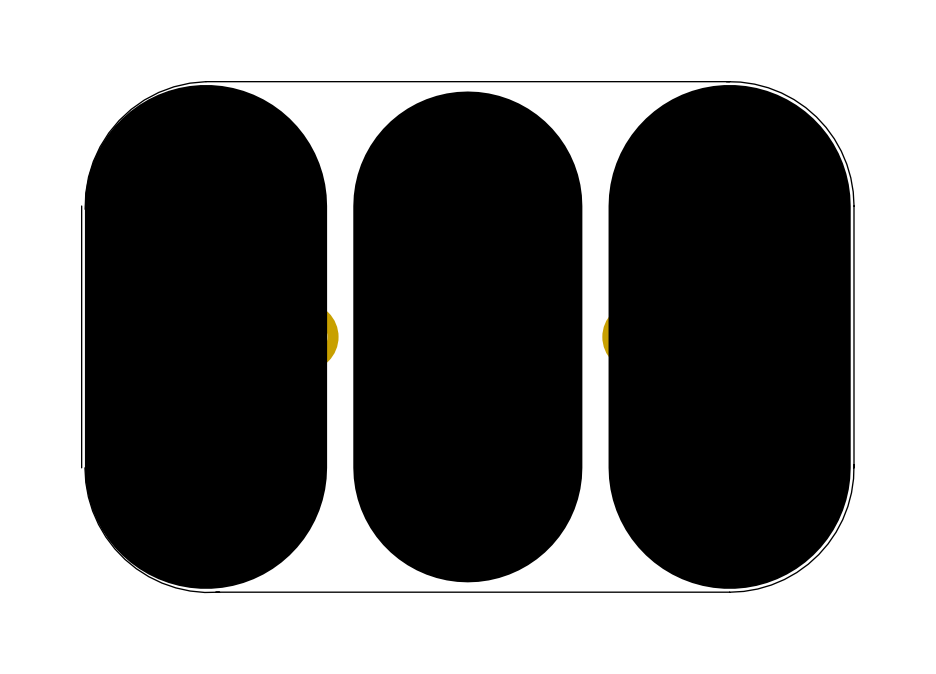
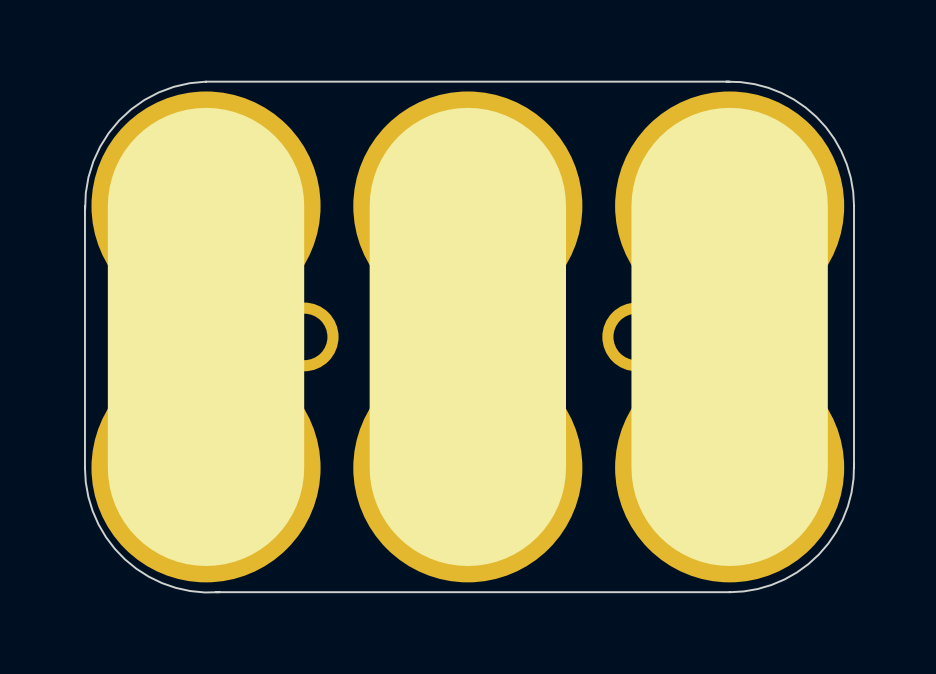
part footprint: [80, 80, 855, 594] -> [84, 80, 855, 594]

